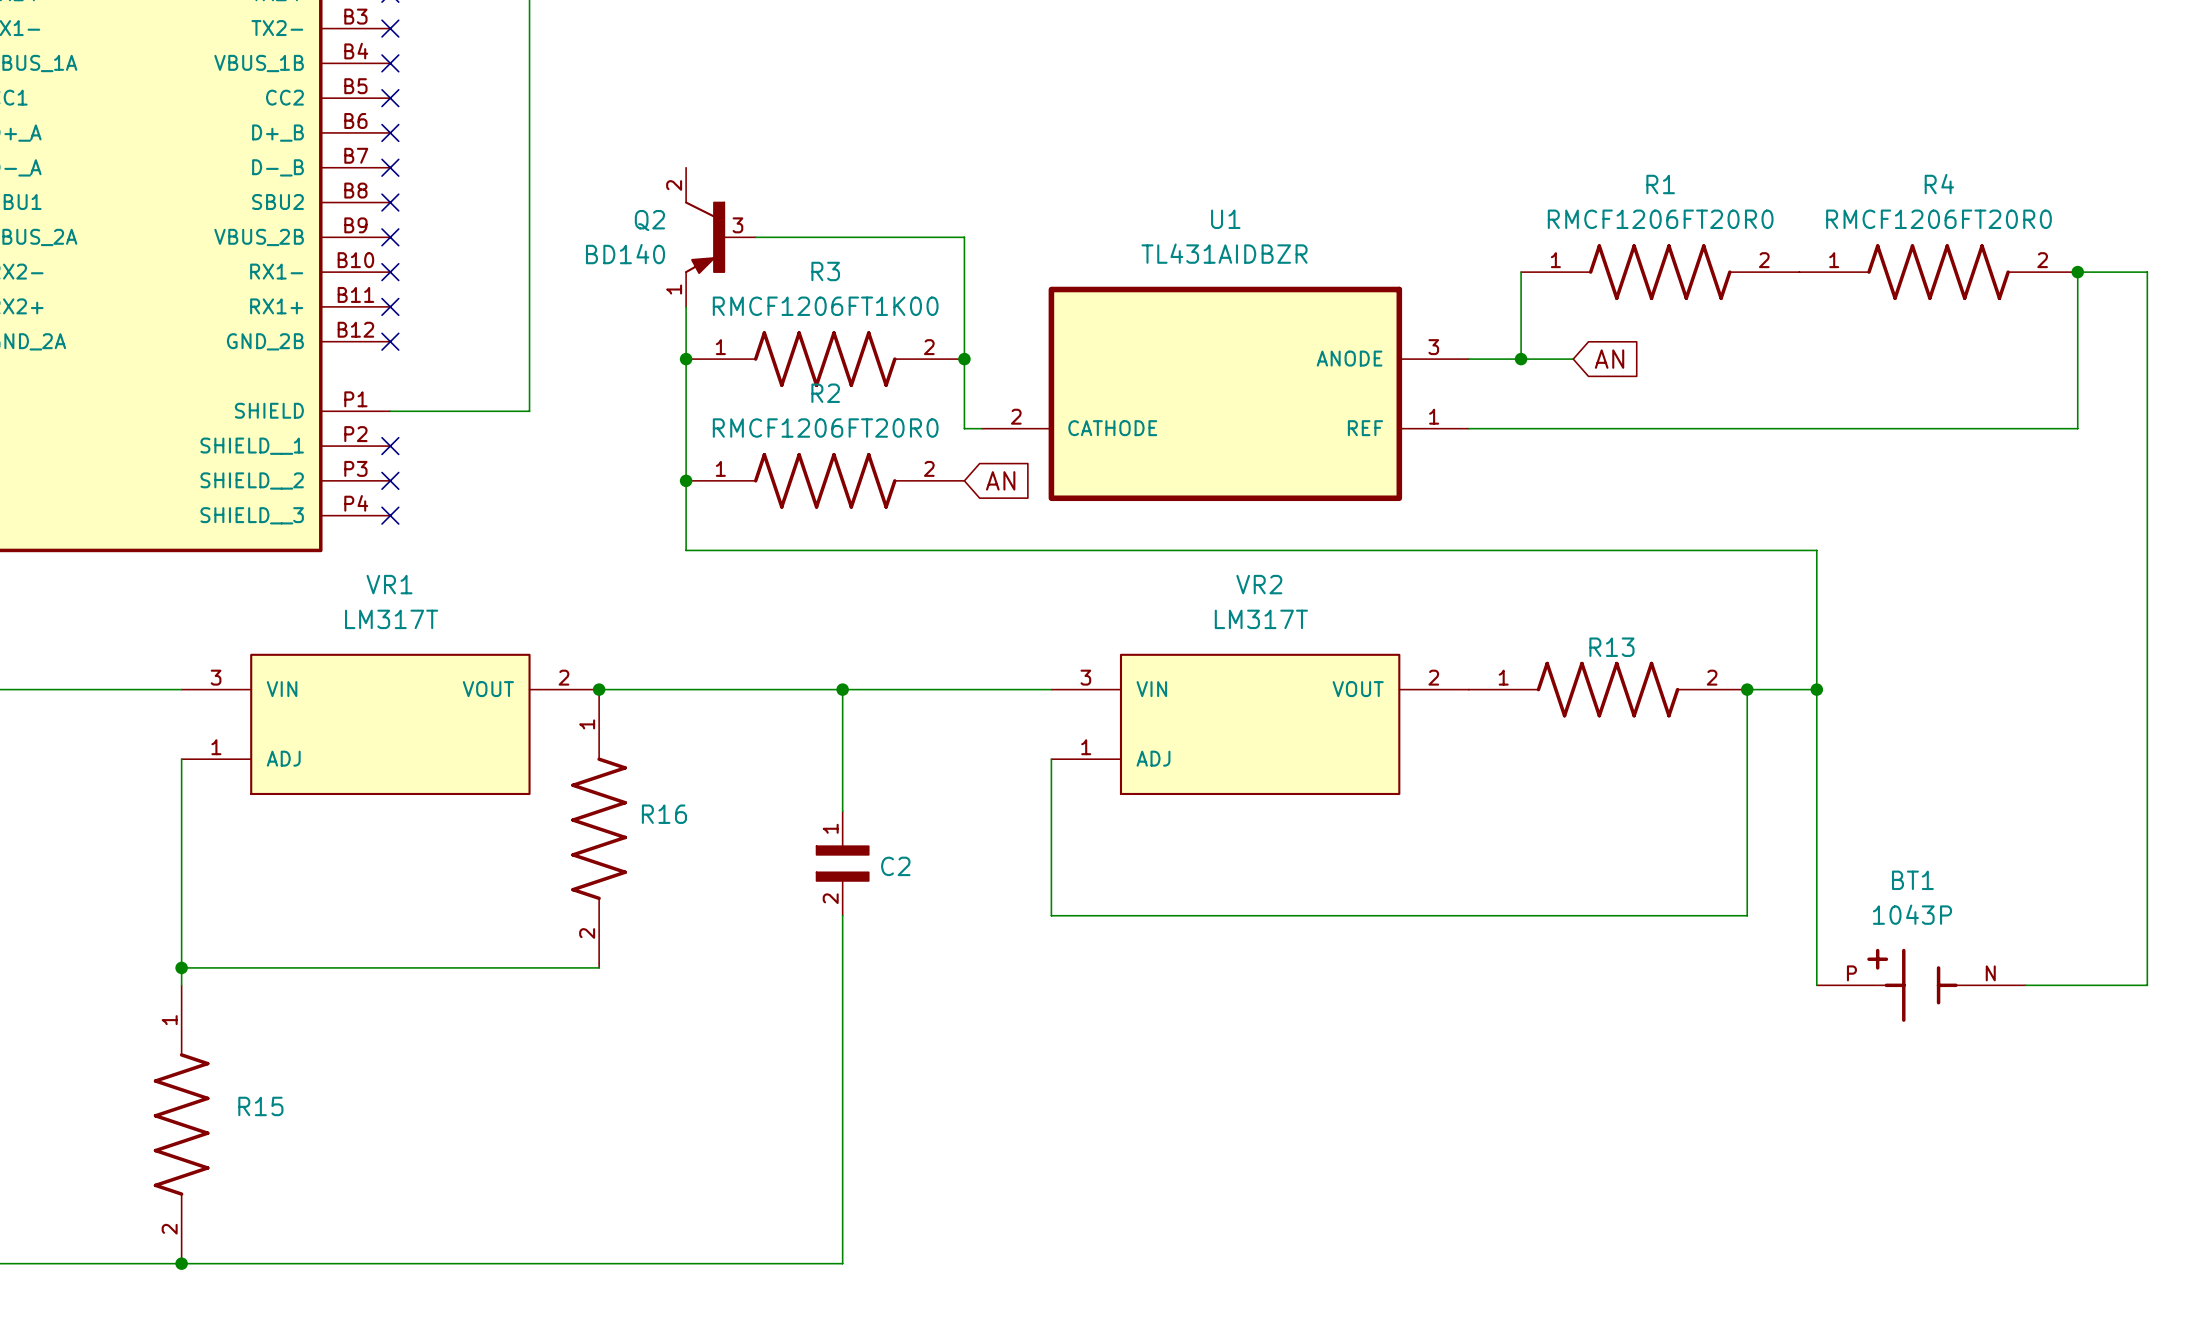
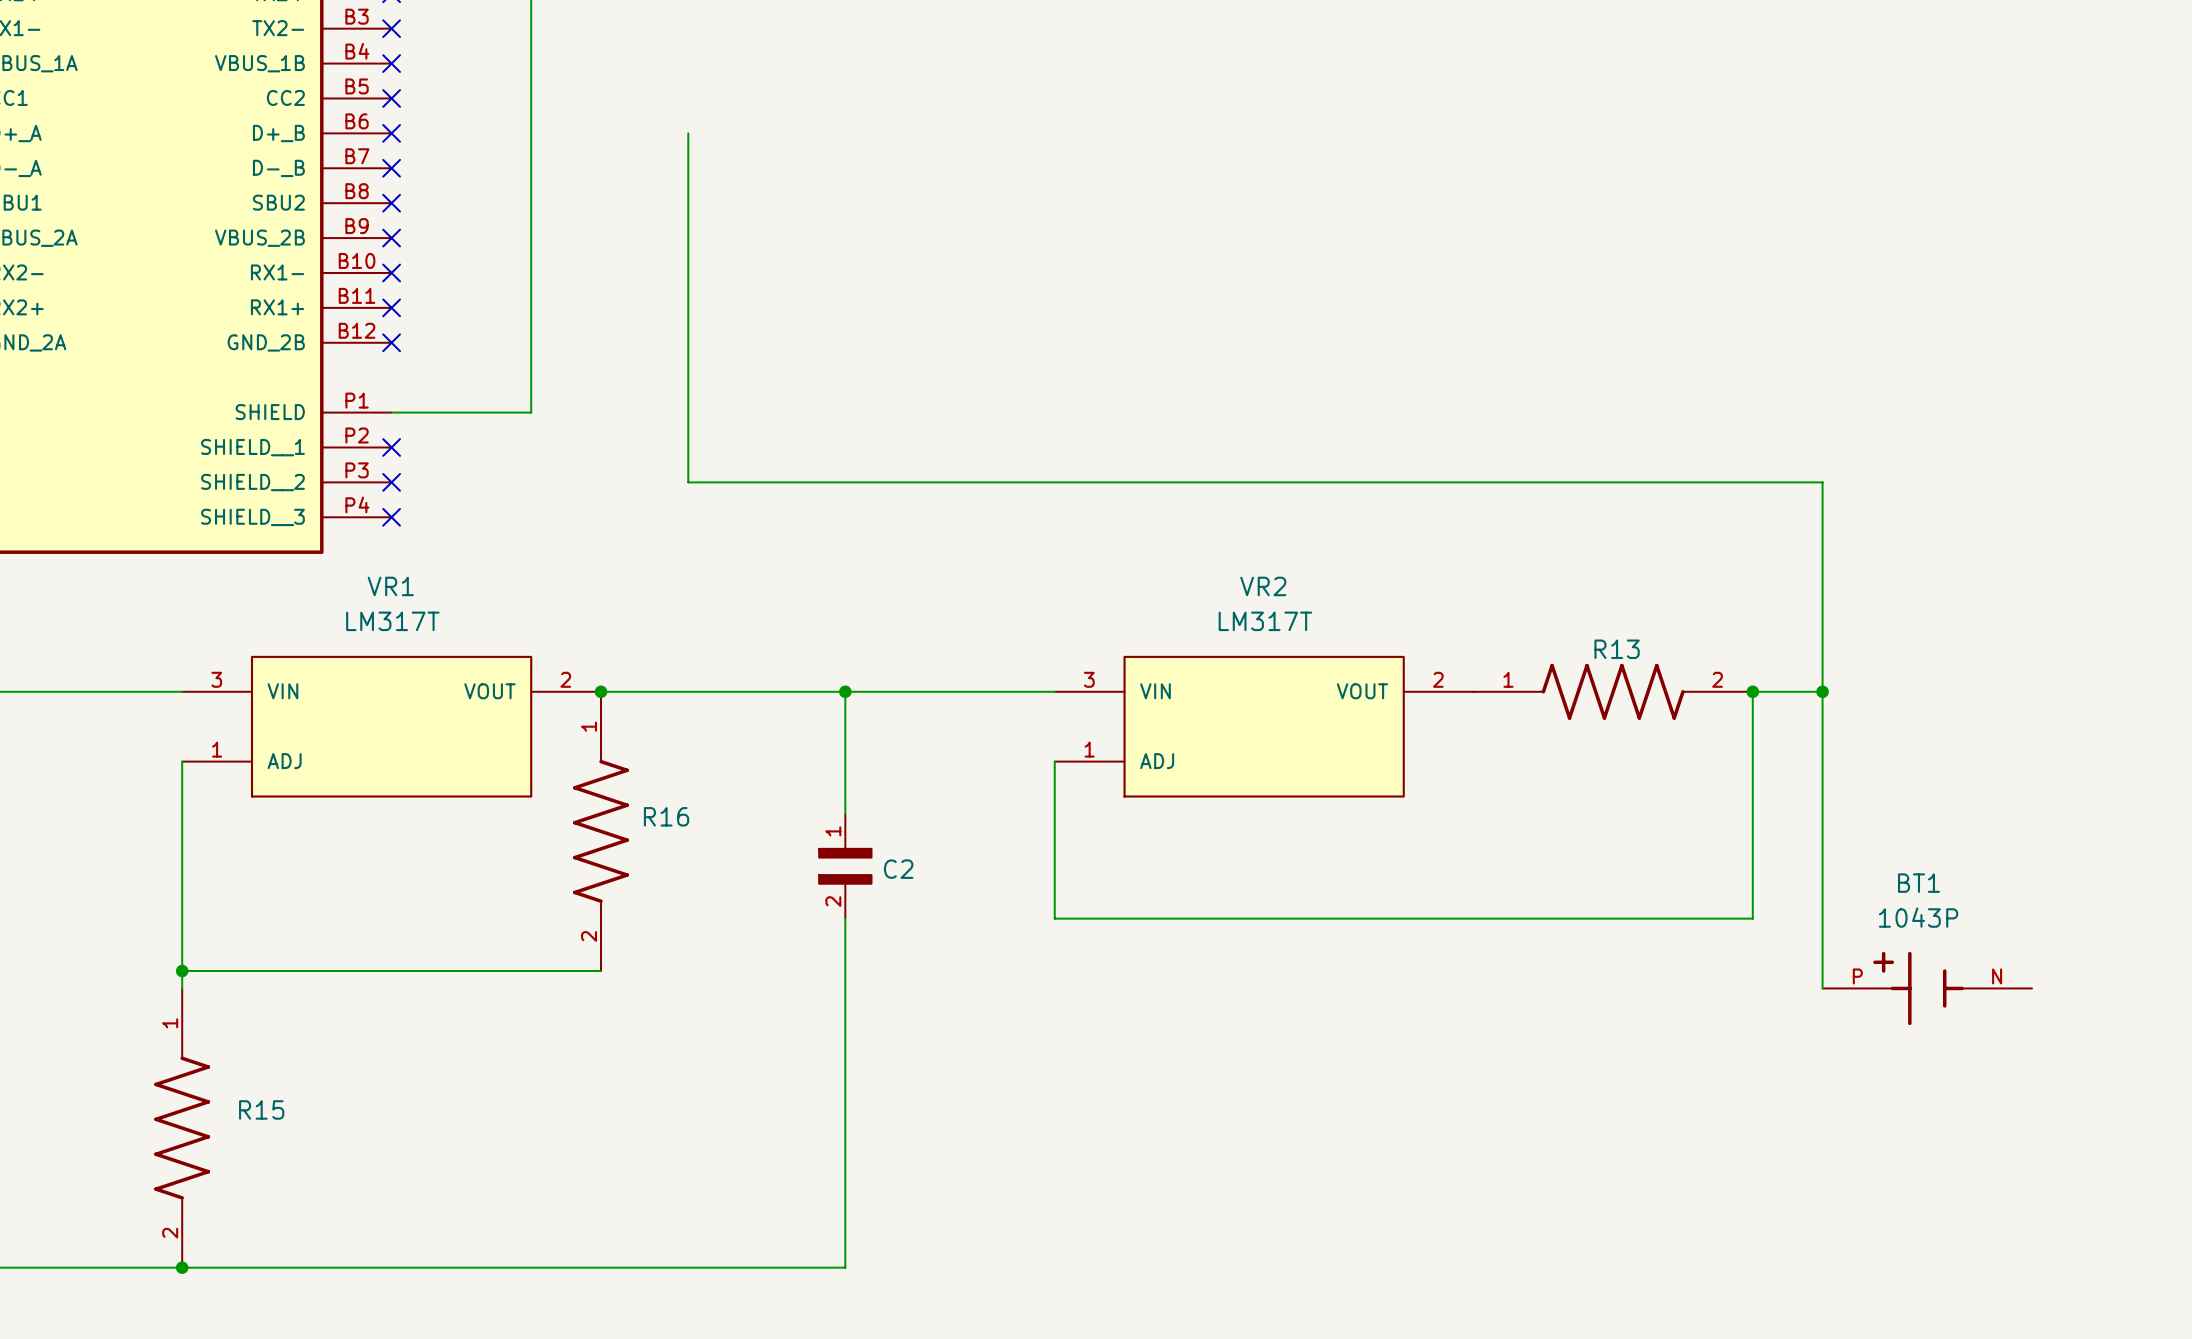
wire: none -> (688, 133) (688, 307)
Q2: BD140 (720, 237) -> none
wire: (755, 237) (964, 237) (964, 428) (981, 428) -> none
wire: (1521, 272) (1521, 359) -> none
R1: RMCF1206FT20R0 (1660, 272) -> none
R4: RMCF1206FT20R0 (1938, 272) -> none
junction: (2077, 272) -> none
junction: (686, 359) -> none
R3: RMCF1206FT1K00 (825, 359) -> none
junction: (964, 359) -> none
wire: (1468, 359) (1573, 359) -> none
junction: (1521, 359) -> none
global label: AN (1609, 359) -> none
U1: TL431AIDBZR (1225, 393) -> none
wire: (1468, 428) (2077, 428) (2077, 272) (2147, 272) (2147, 985) (2025, 985) -> none
wire: (686, 480) (686, 550) (1816, 550) -> (688, 482) (1822, 482) (1822, 552)
junction: (686, 480) -> none
R2: RMCF1206FT20R0 (825, 480) -> none
global label: AN (1000, 480) -> none

